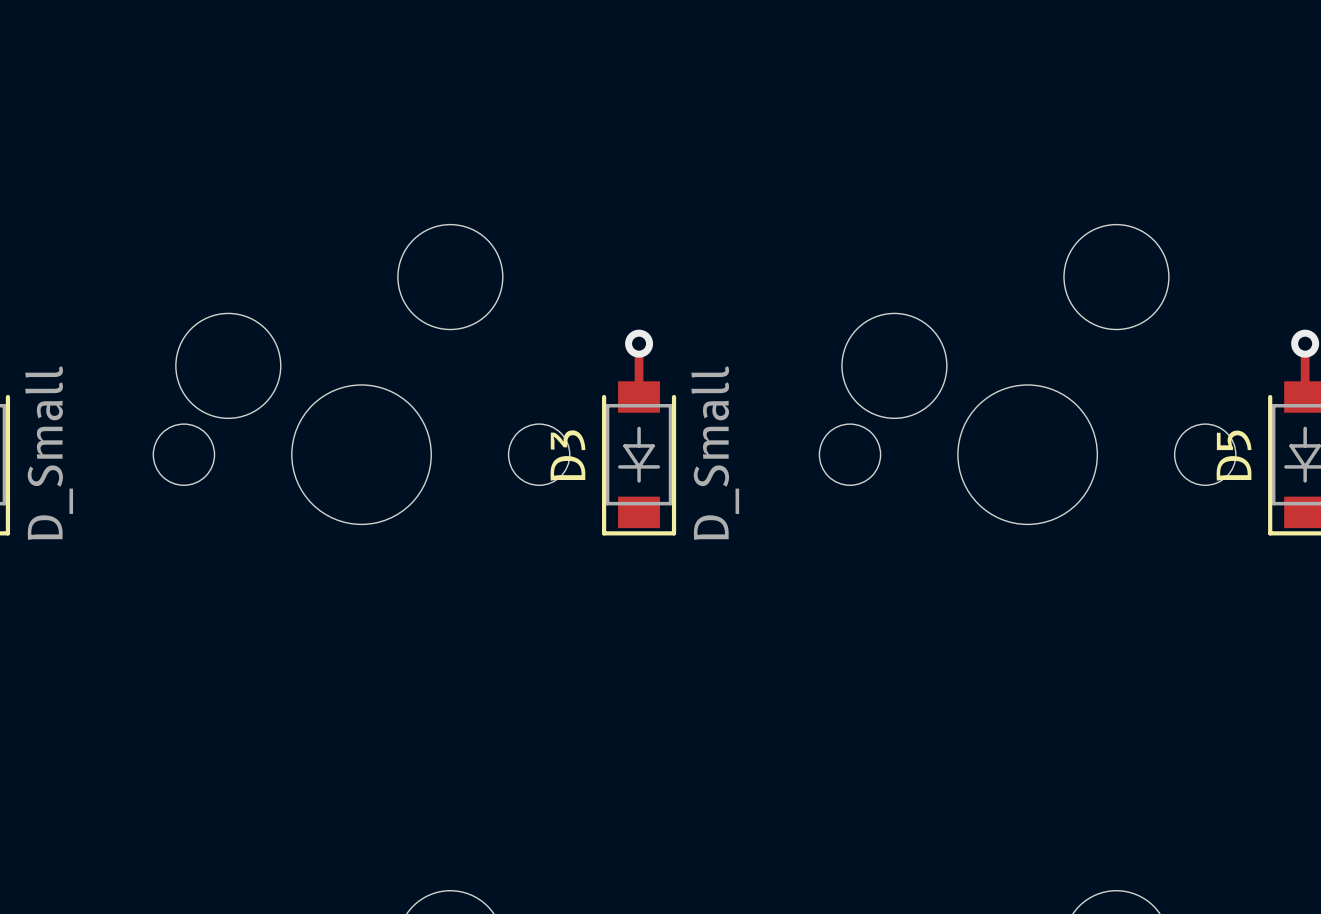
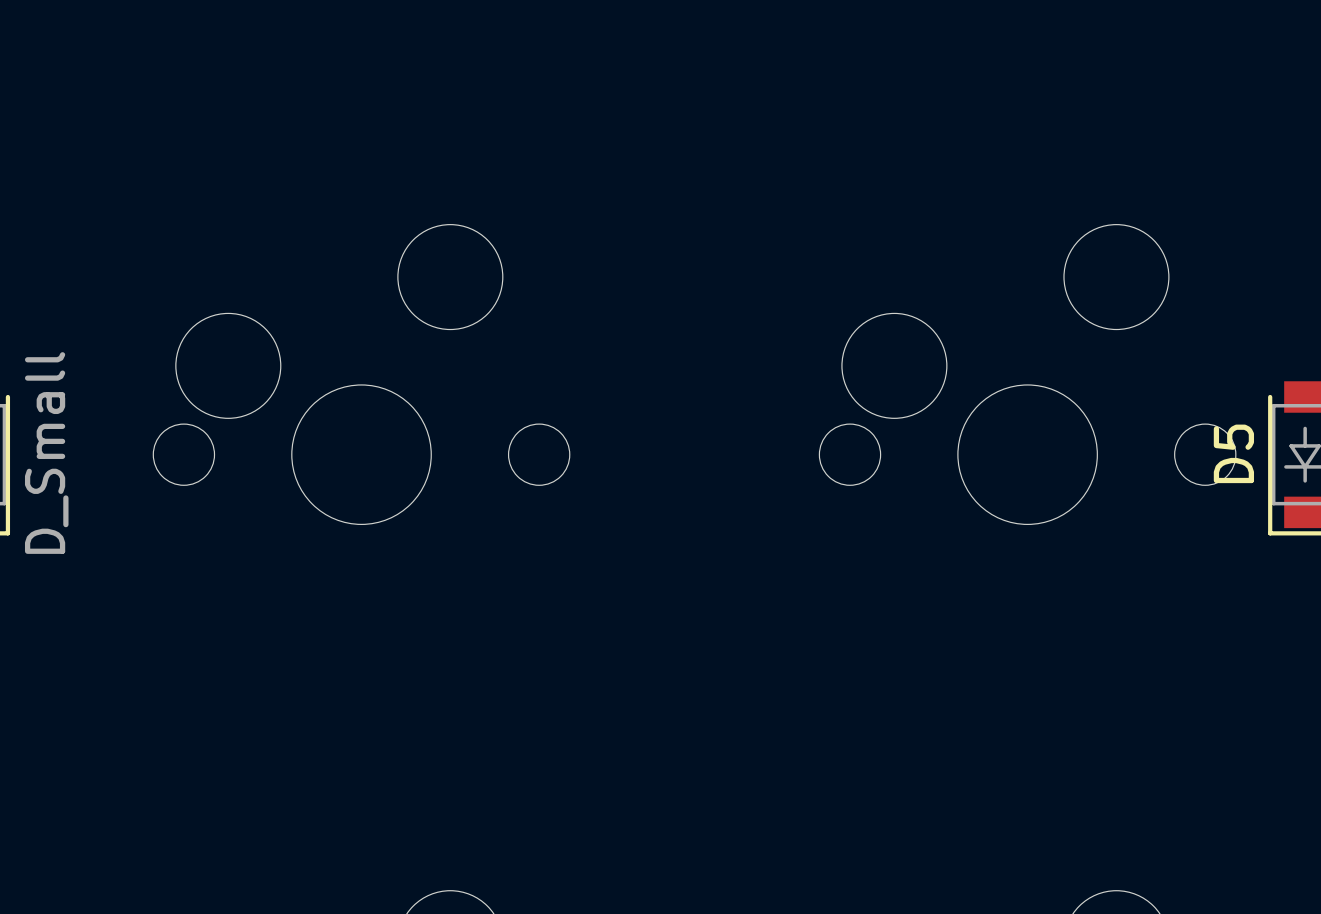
track: (639, 343) (639, 396) -> none
via: (639, 343) -> none
track: (1305, 343) (1305, 396) -> none
via: (1305, 343) -> none
D3: D_Small (639, 458) -> none

